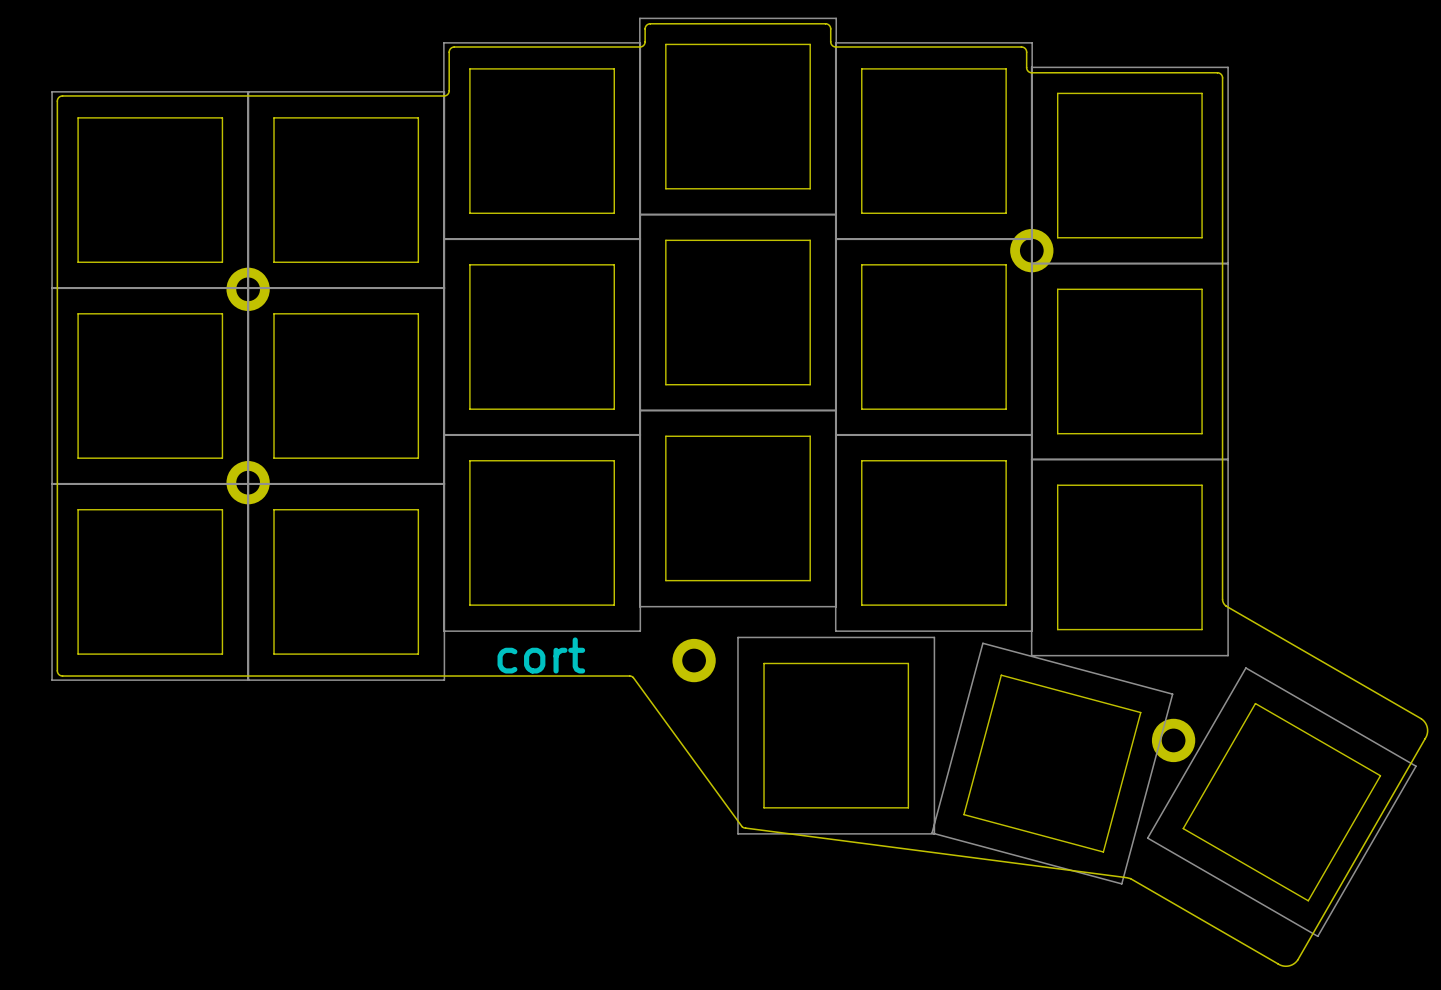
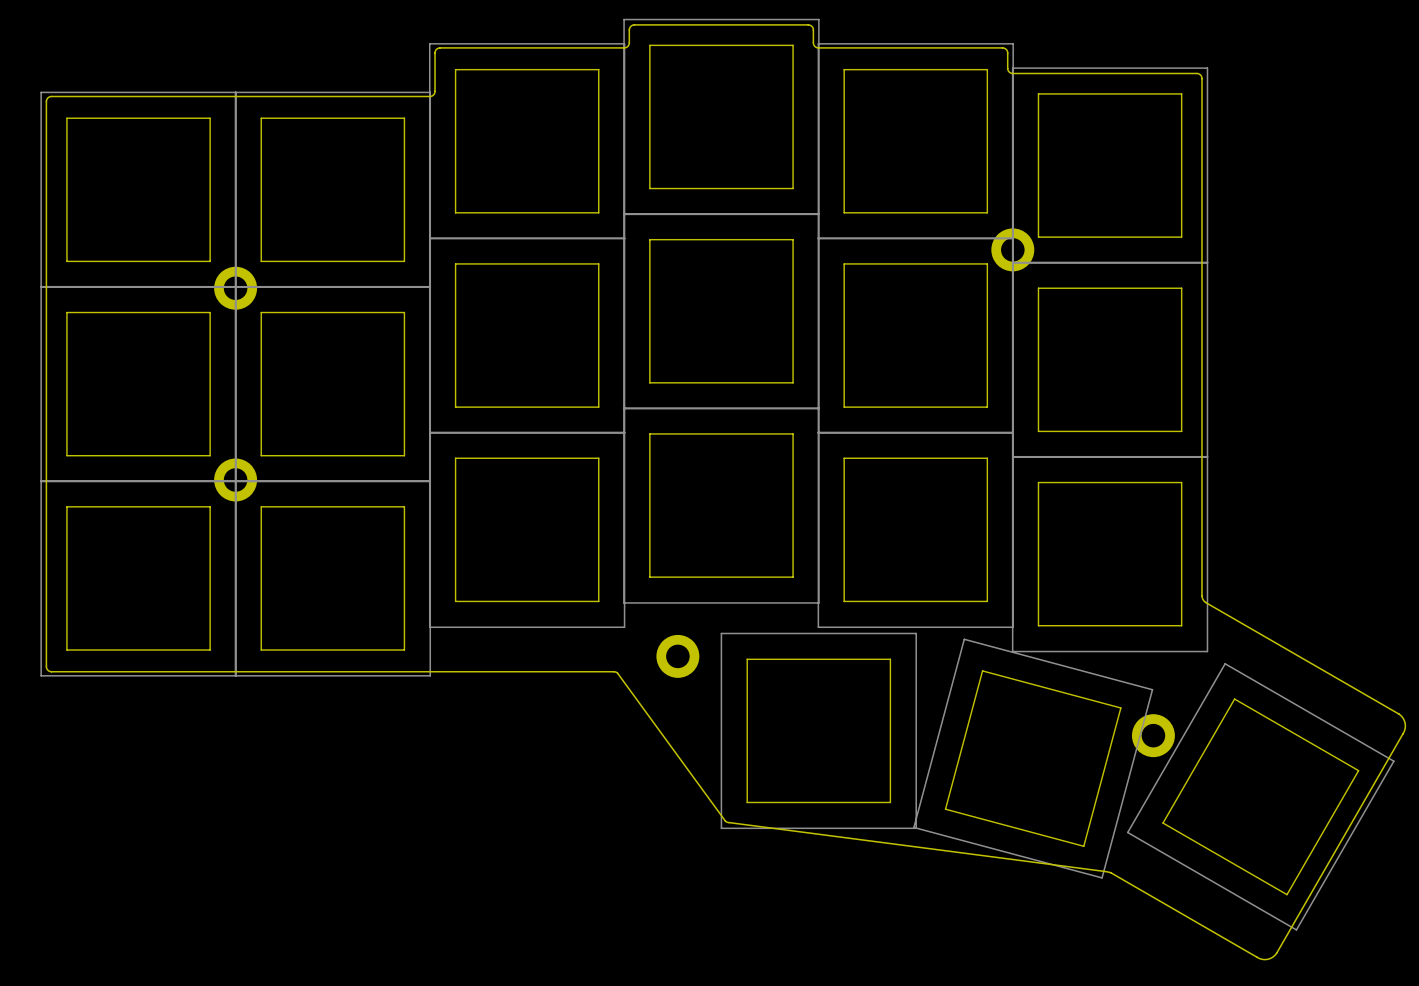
text: cort (541, 655) -> none

